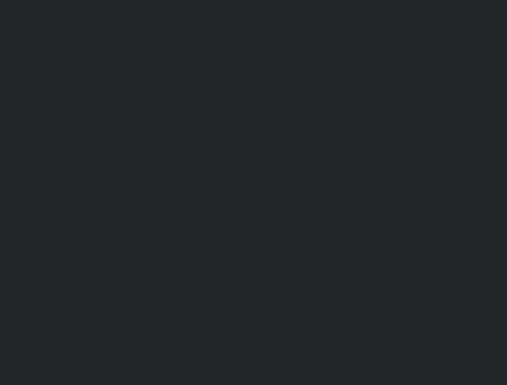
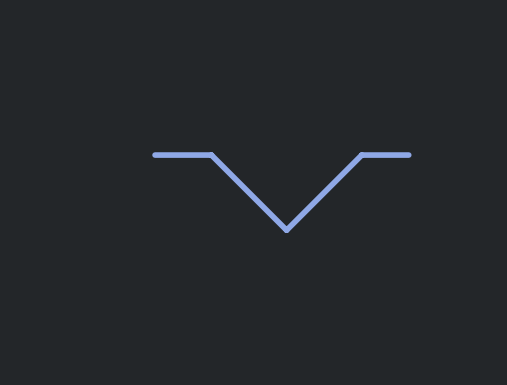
line: none -> (155, 155) (211, 155) (286, 230) (361, 155) (408, 155)

